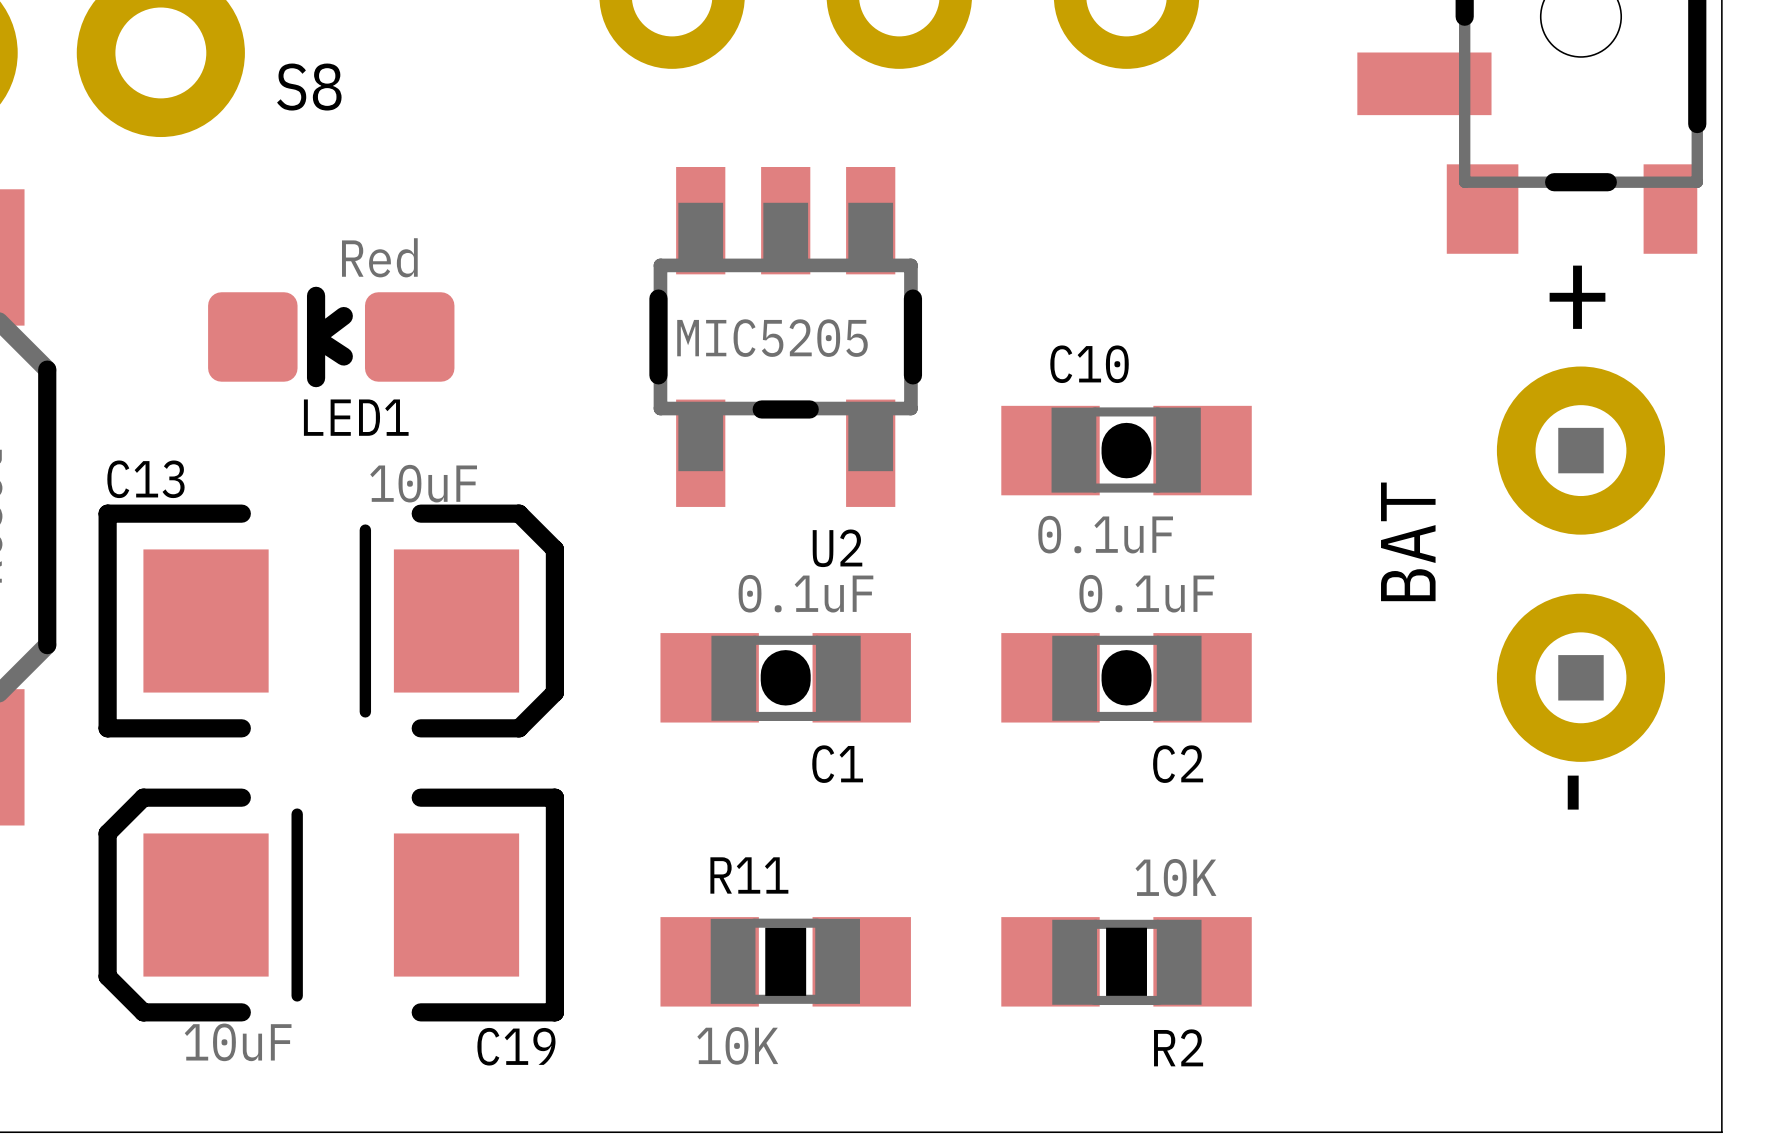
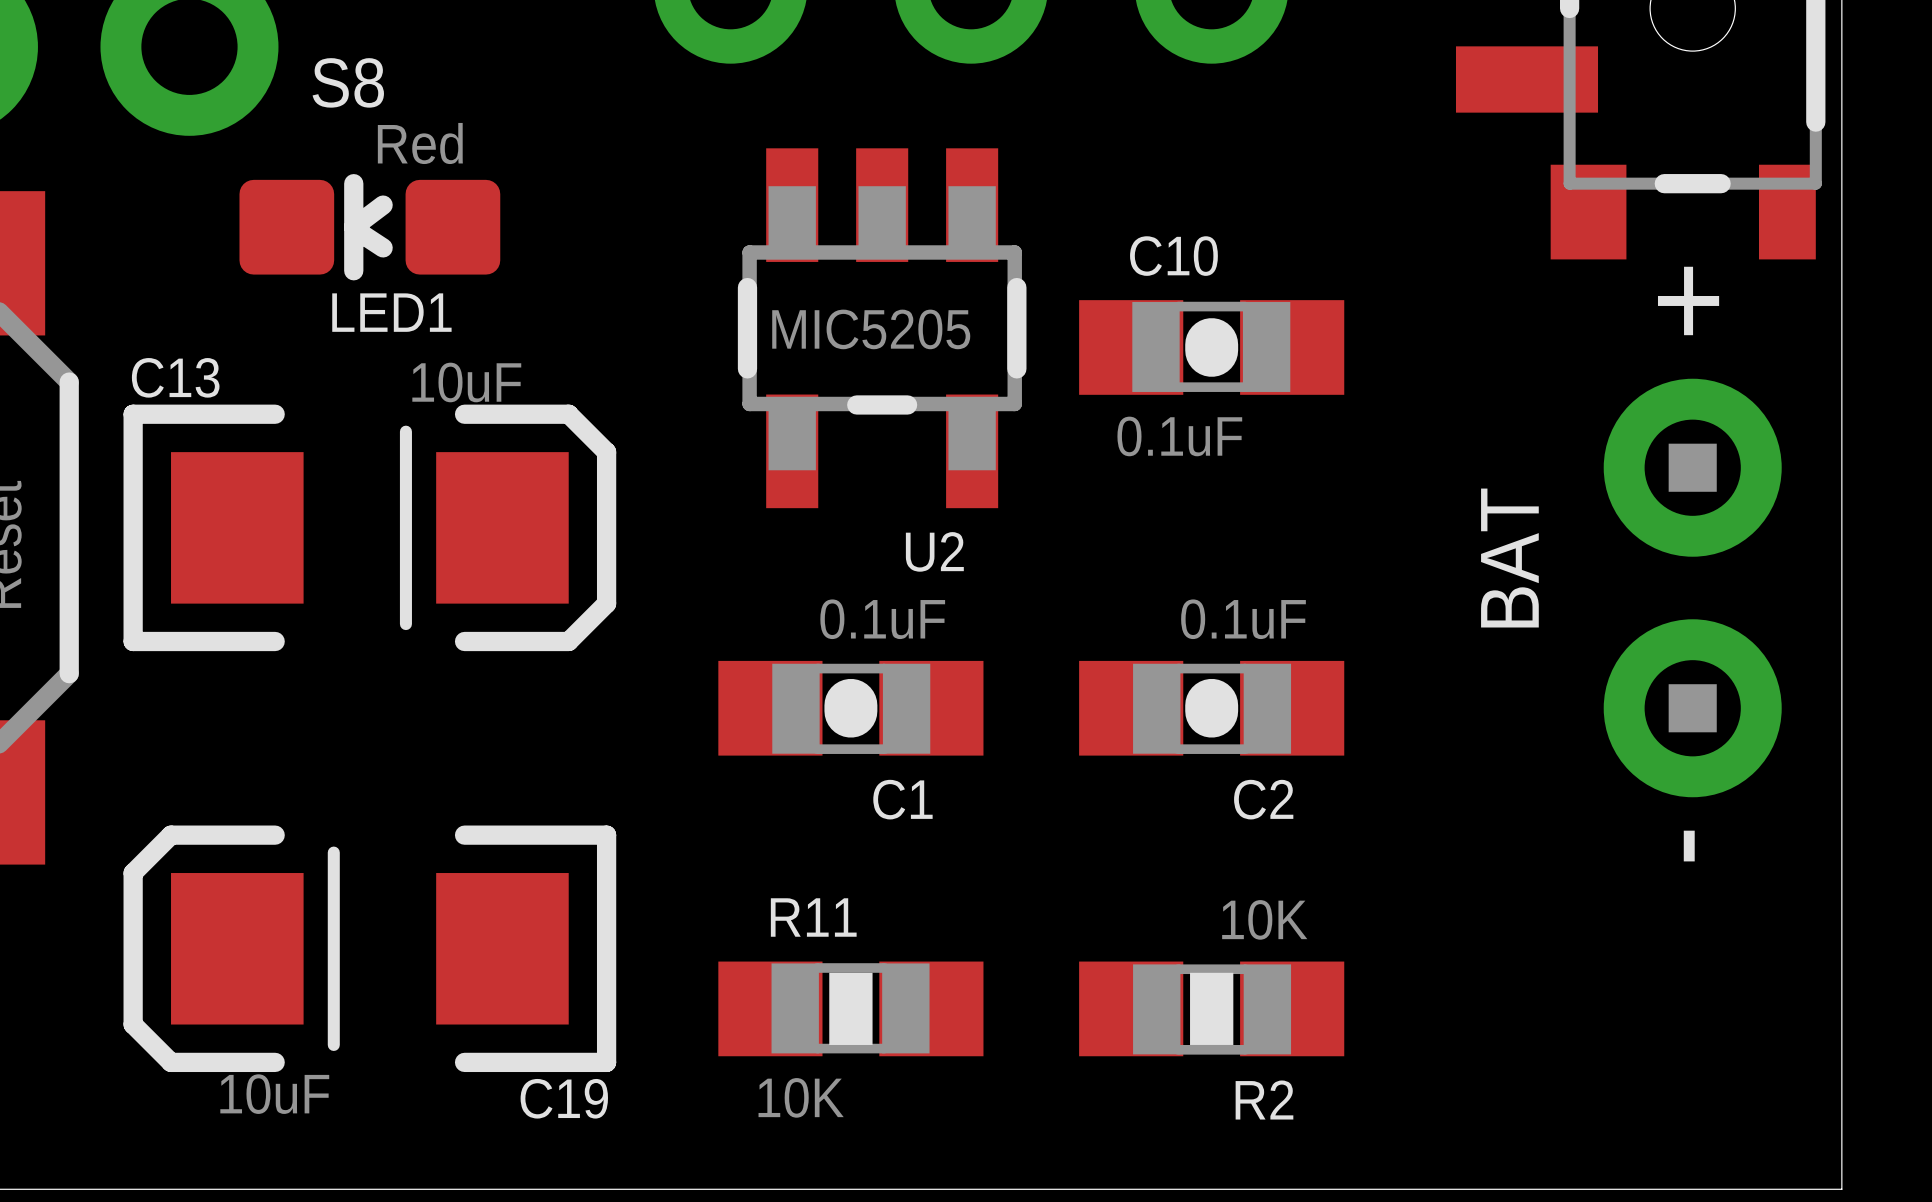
LED1 position: (331, 336) -> (369, 227)
U2 position: (785, 336) -> (882, 328)
C10 position: (1126, 450) -> (1211, 347)
C13 position: (331, 620) -> (369, 527)

